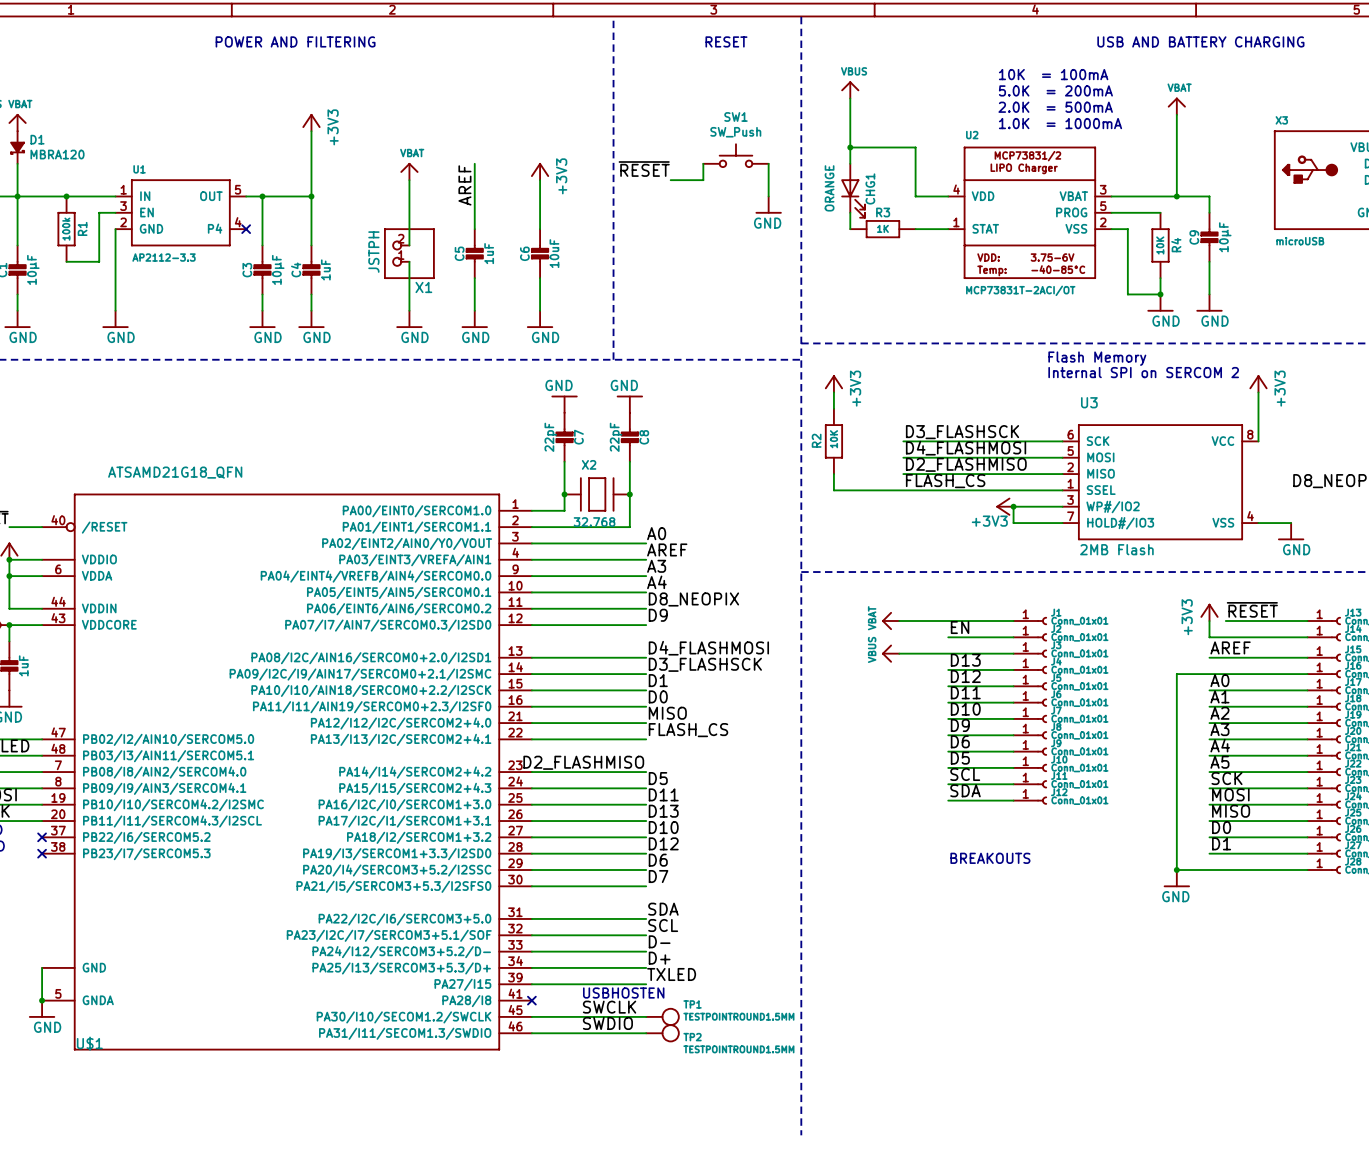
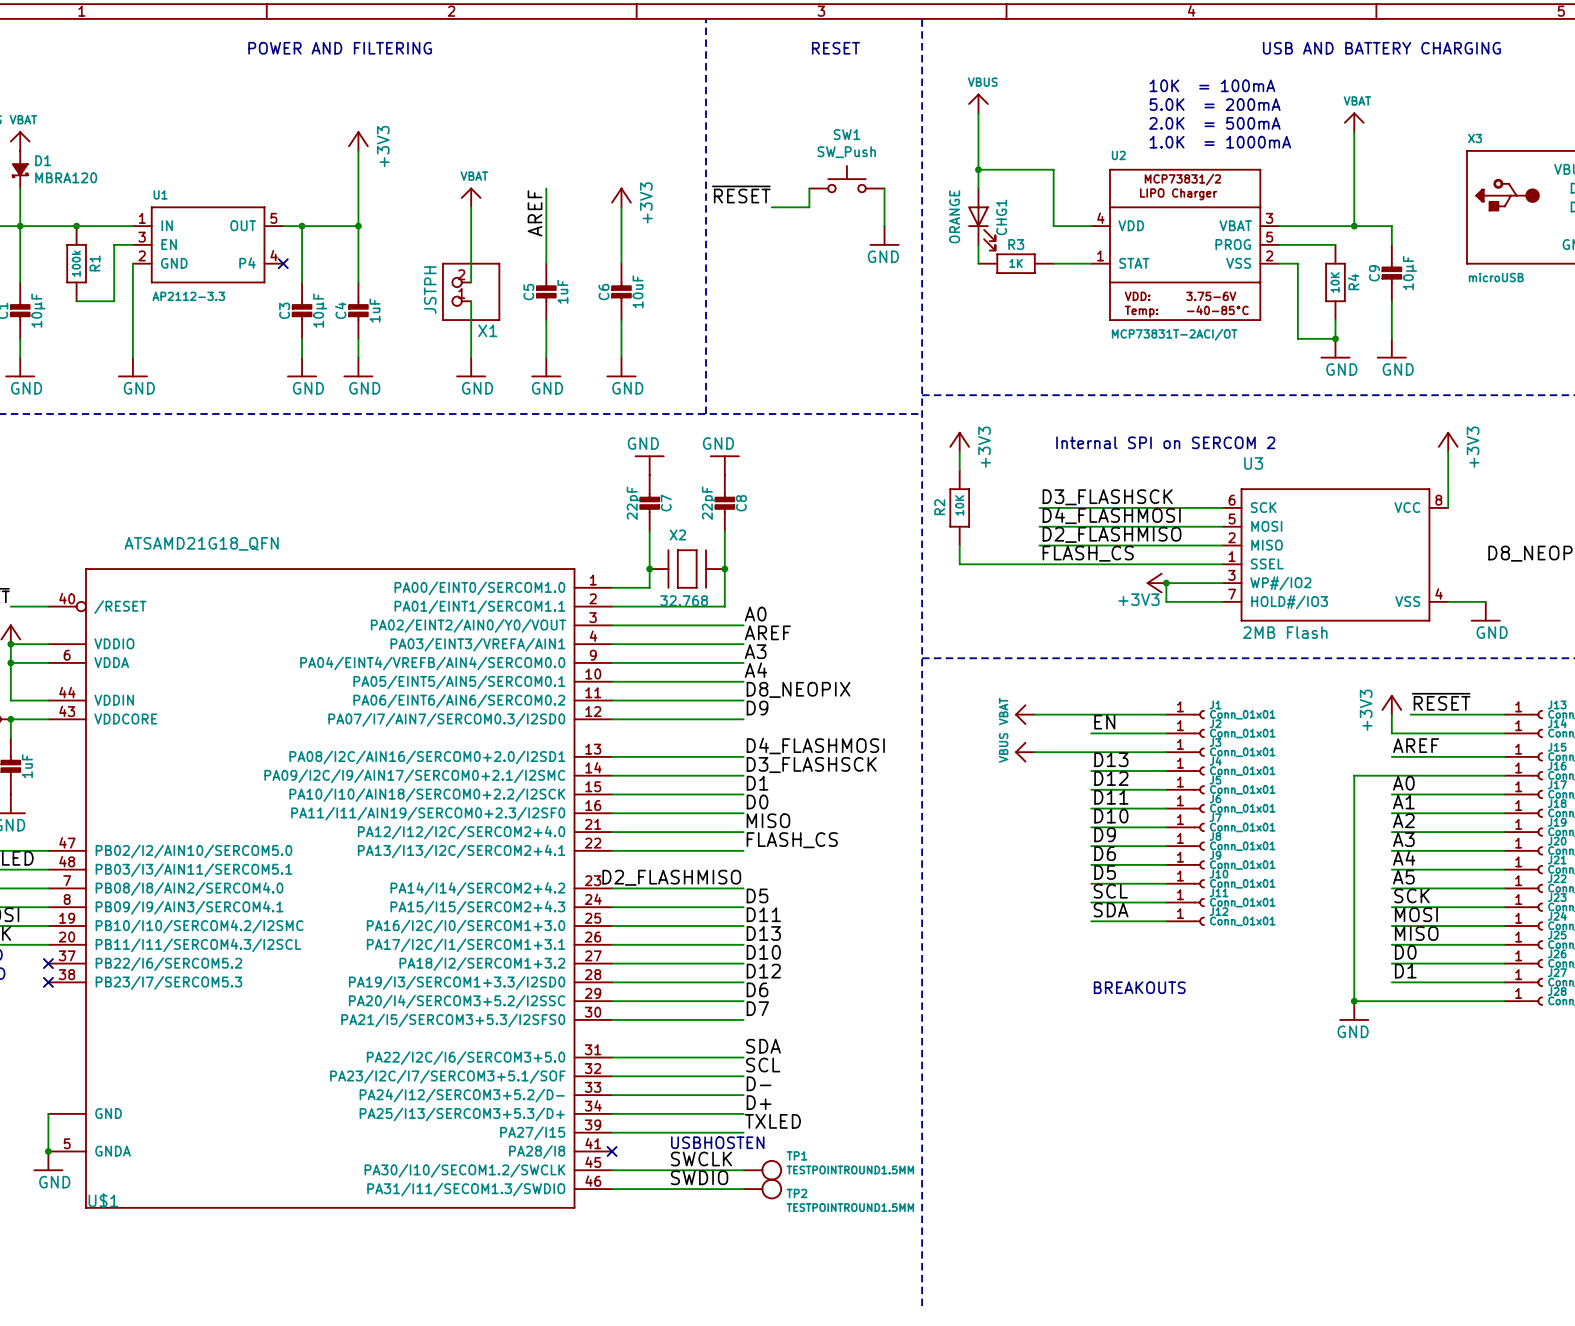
text: Flash Memory (1097, 358) -> none
text position: Internal SPI on SERCOM 2 (1143, 372) -> Internal SPI on SERCOM 2 (1165, 442)

